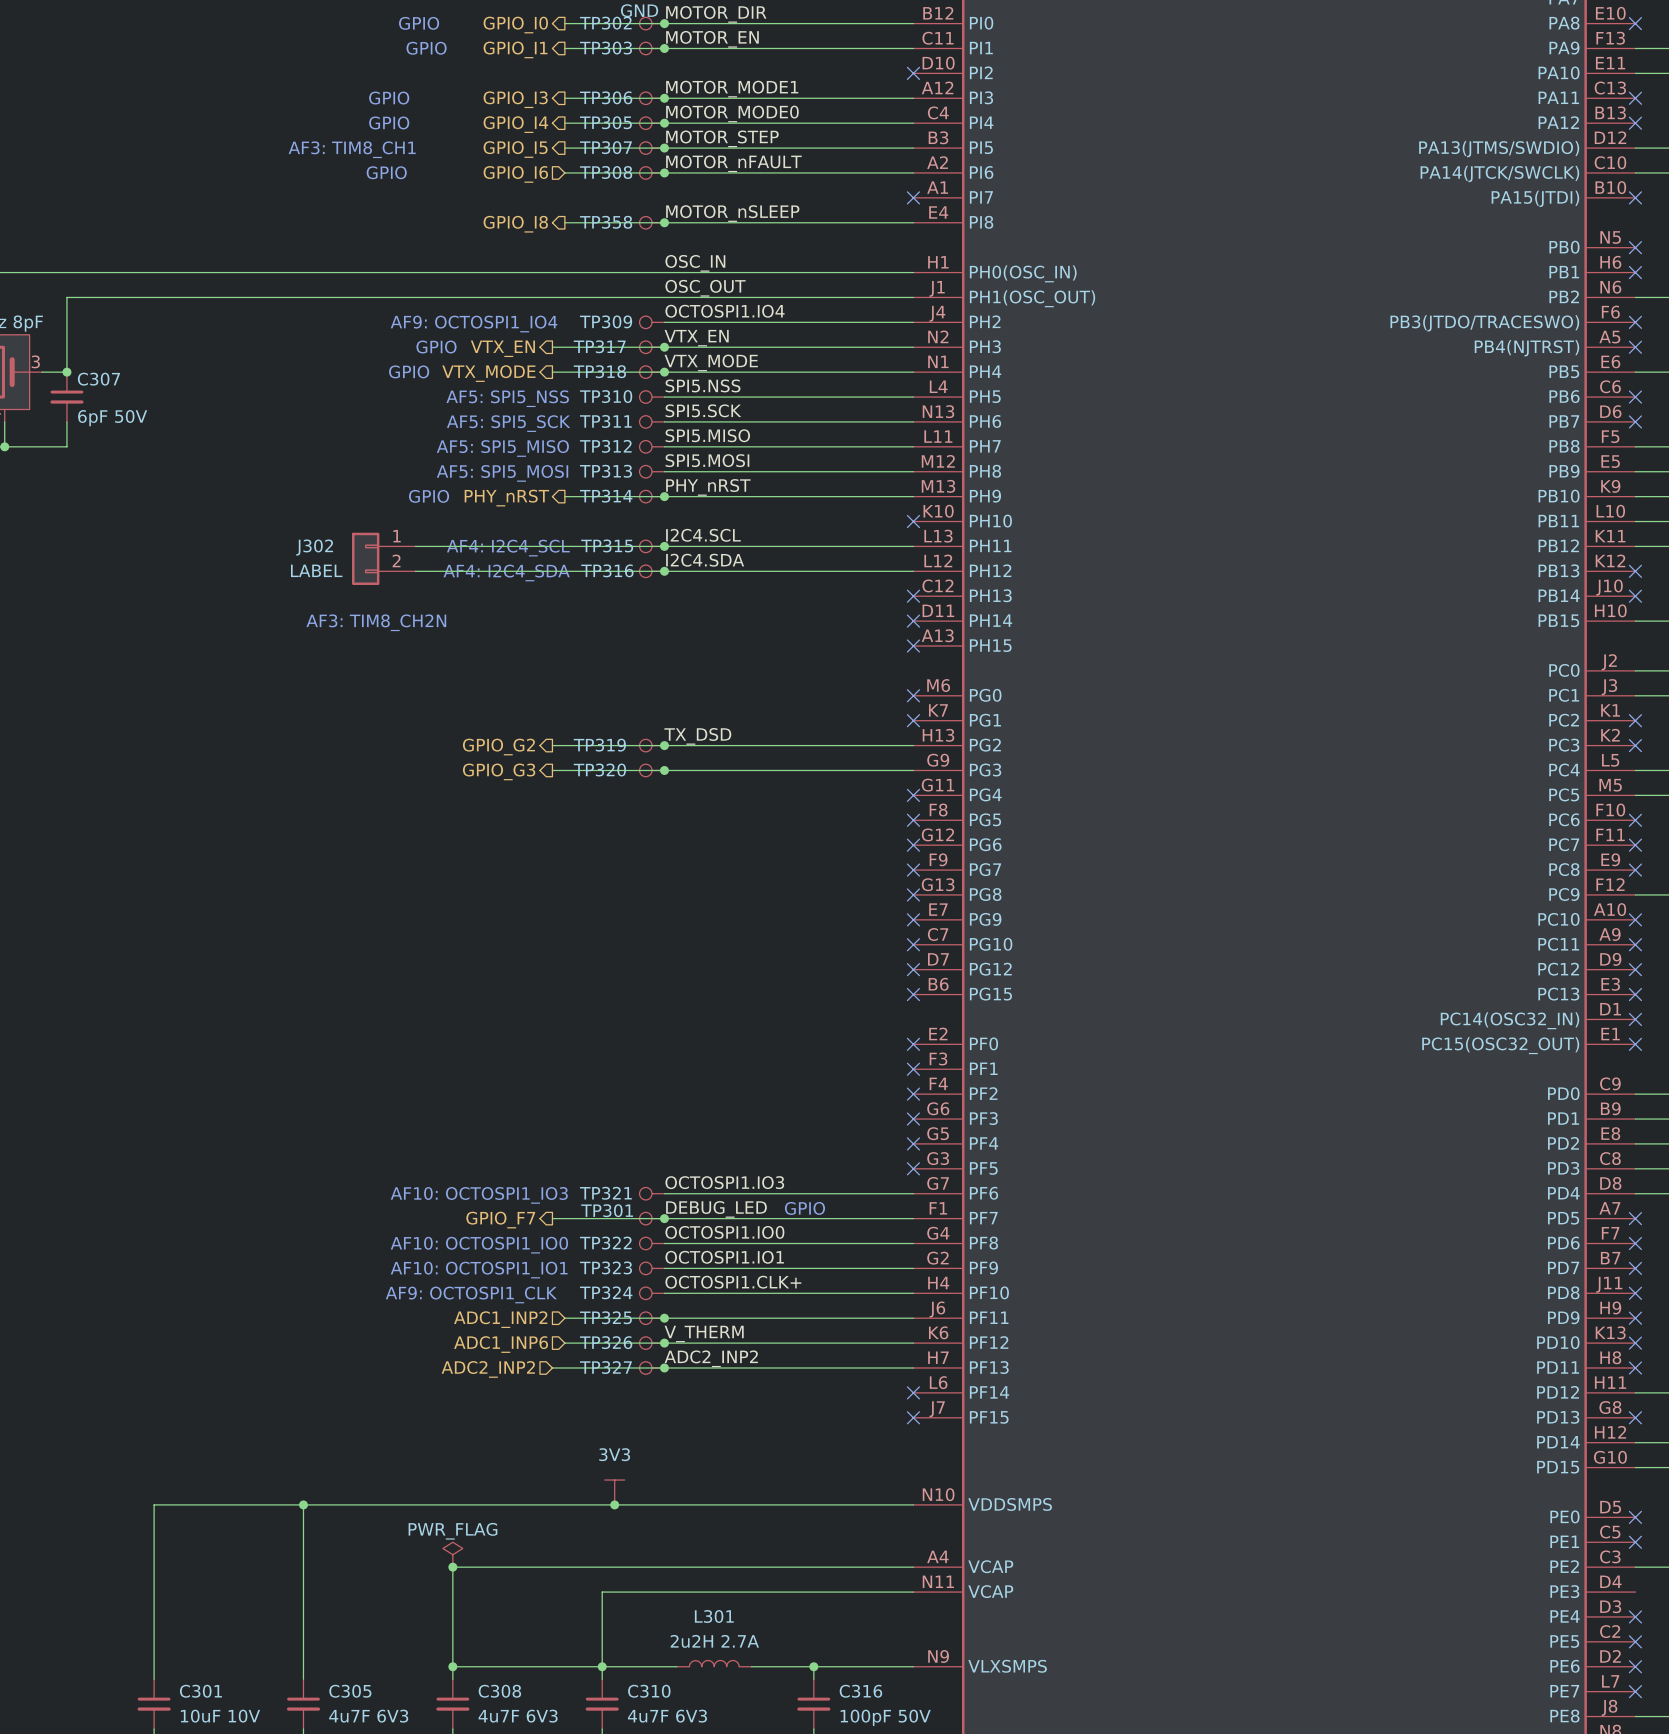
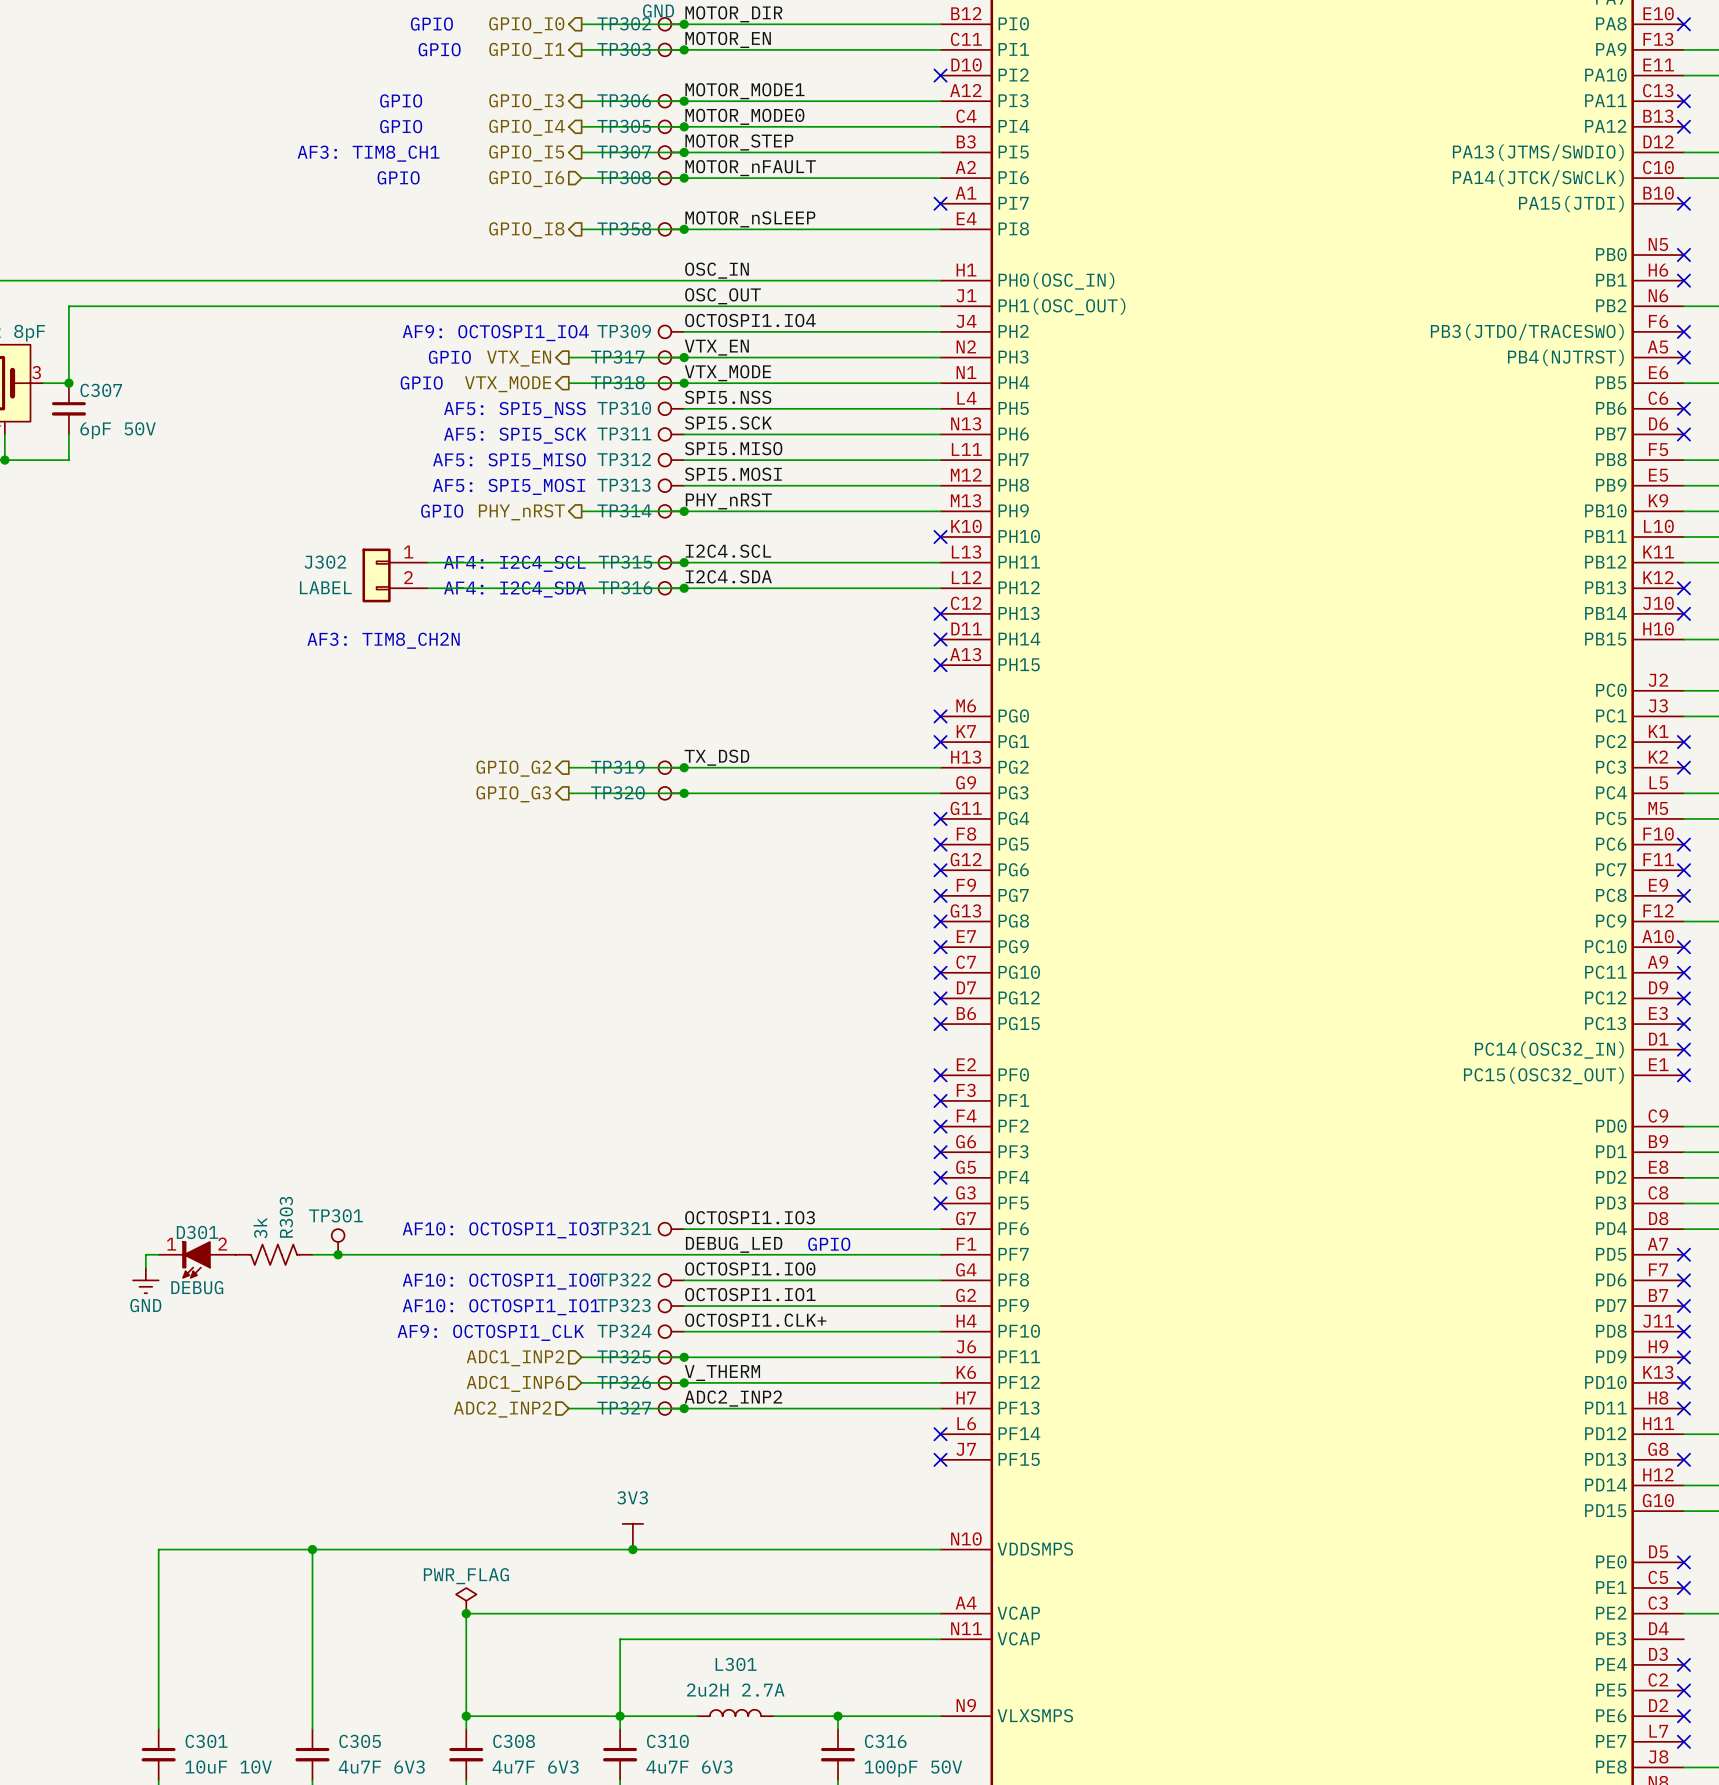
TP301 name position: TP301 (607, 1210) -> TP301 (336, 1215)
wire: none -> (158, 1254) (145, 1254) (145, 1267)
R303: none -> 3k (274, 1254)
wire: none -> (312, 1254) (568, 1254)
junction: none -> (338, 1254)
TP301 rotation: 0° (645, 1218) -> 90° clockwise (338, 1235)
TP301 position: (652, 1218) -> (338, 1241)
junction: (664, 1218) -> none
hierarchical label: GPIO_F7 (500, 1220) -> none
D301: none -> DEBUG (197, 1259)
power symbol: none -> GND (145, 1280)

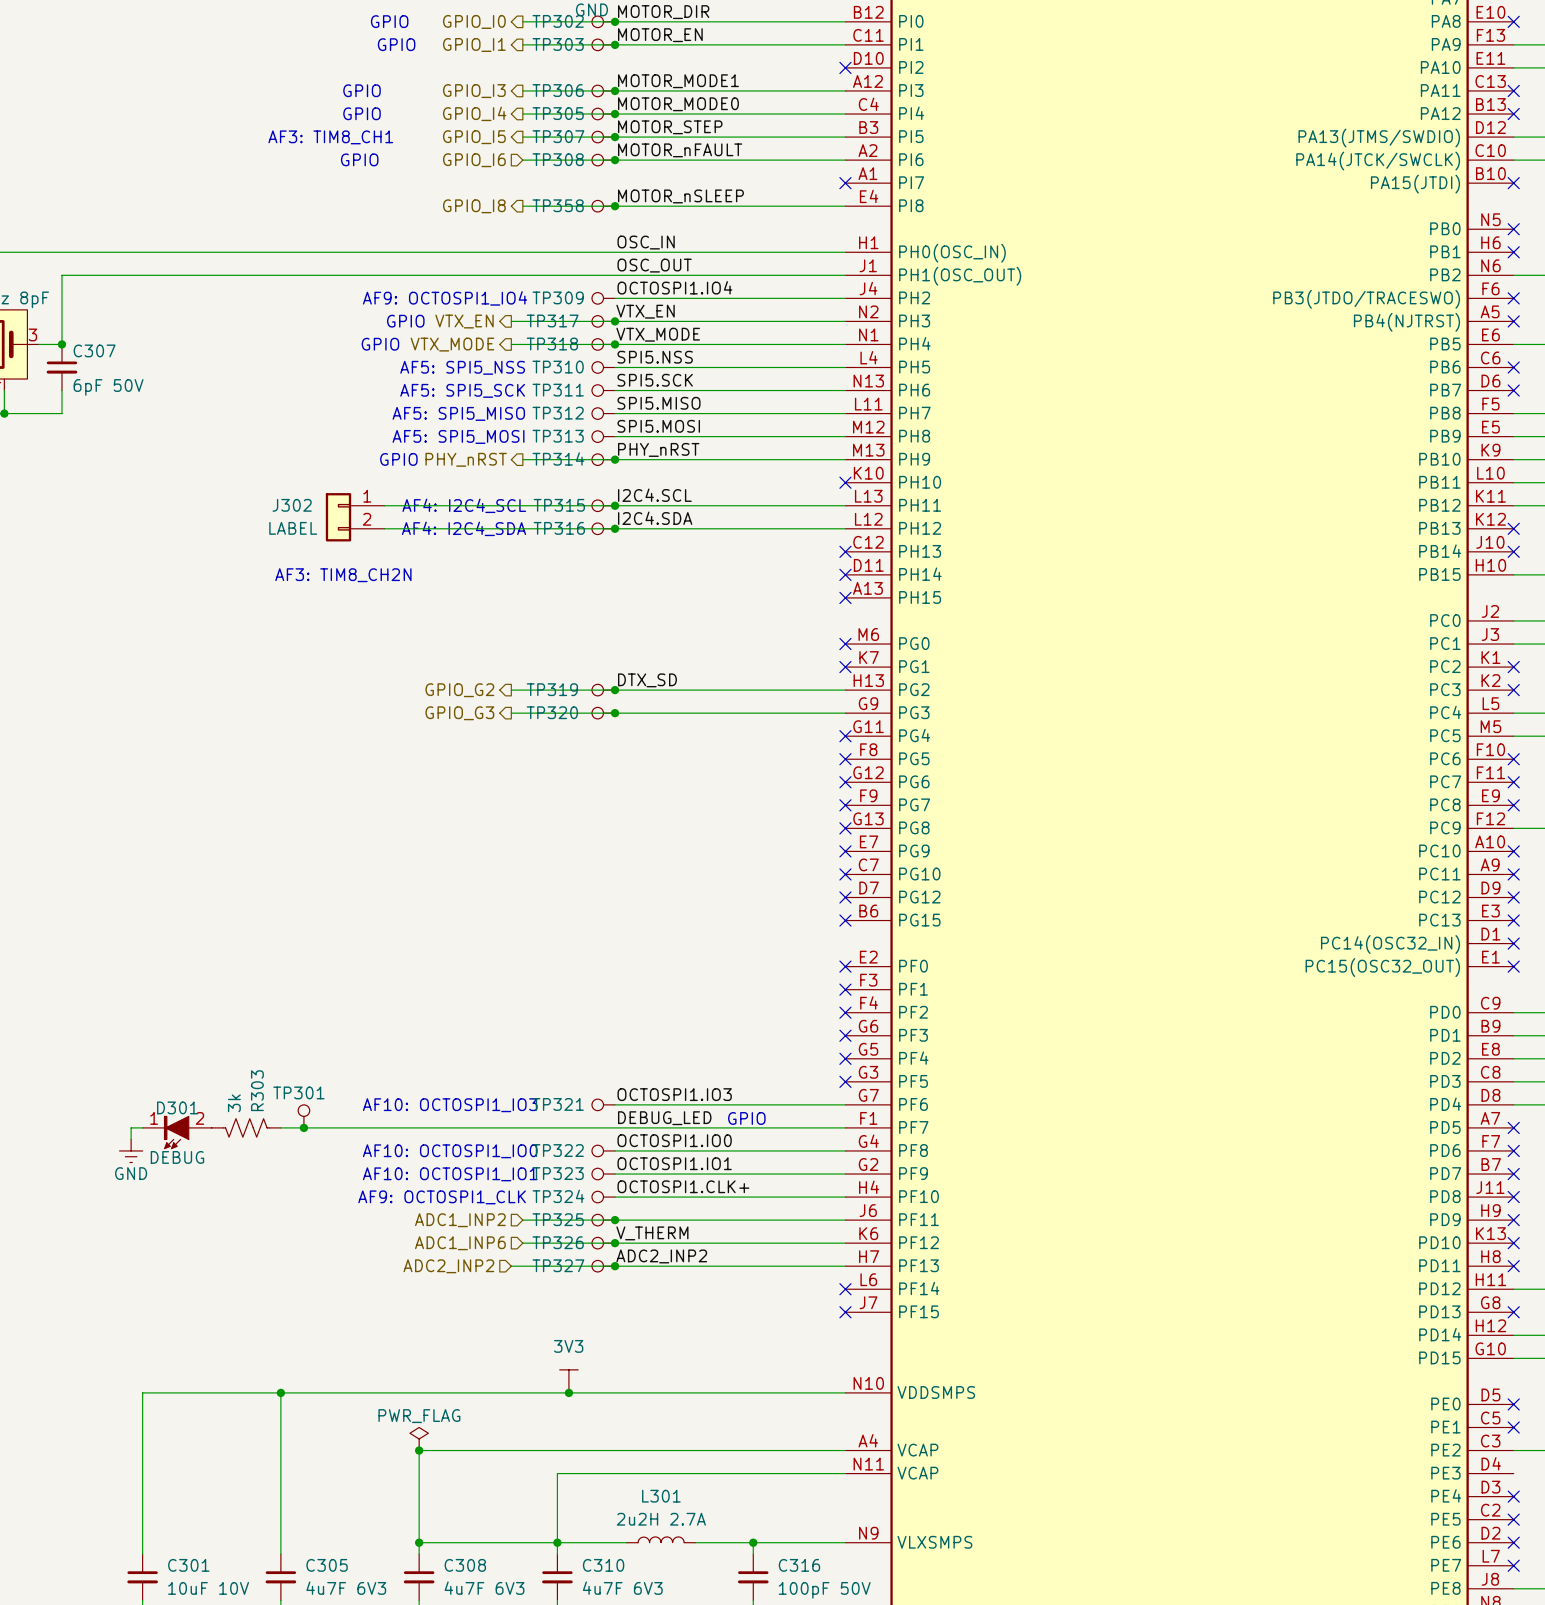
label: TX_DSD (716, 757) -> DTX_SD (647, 680)

